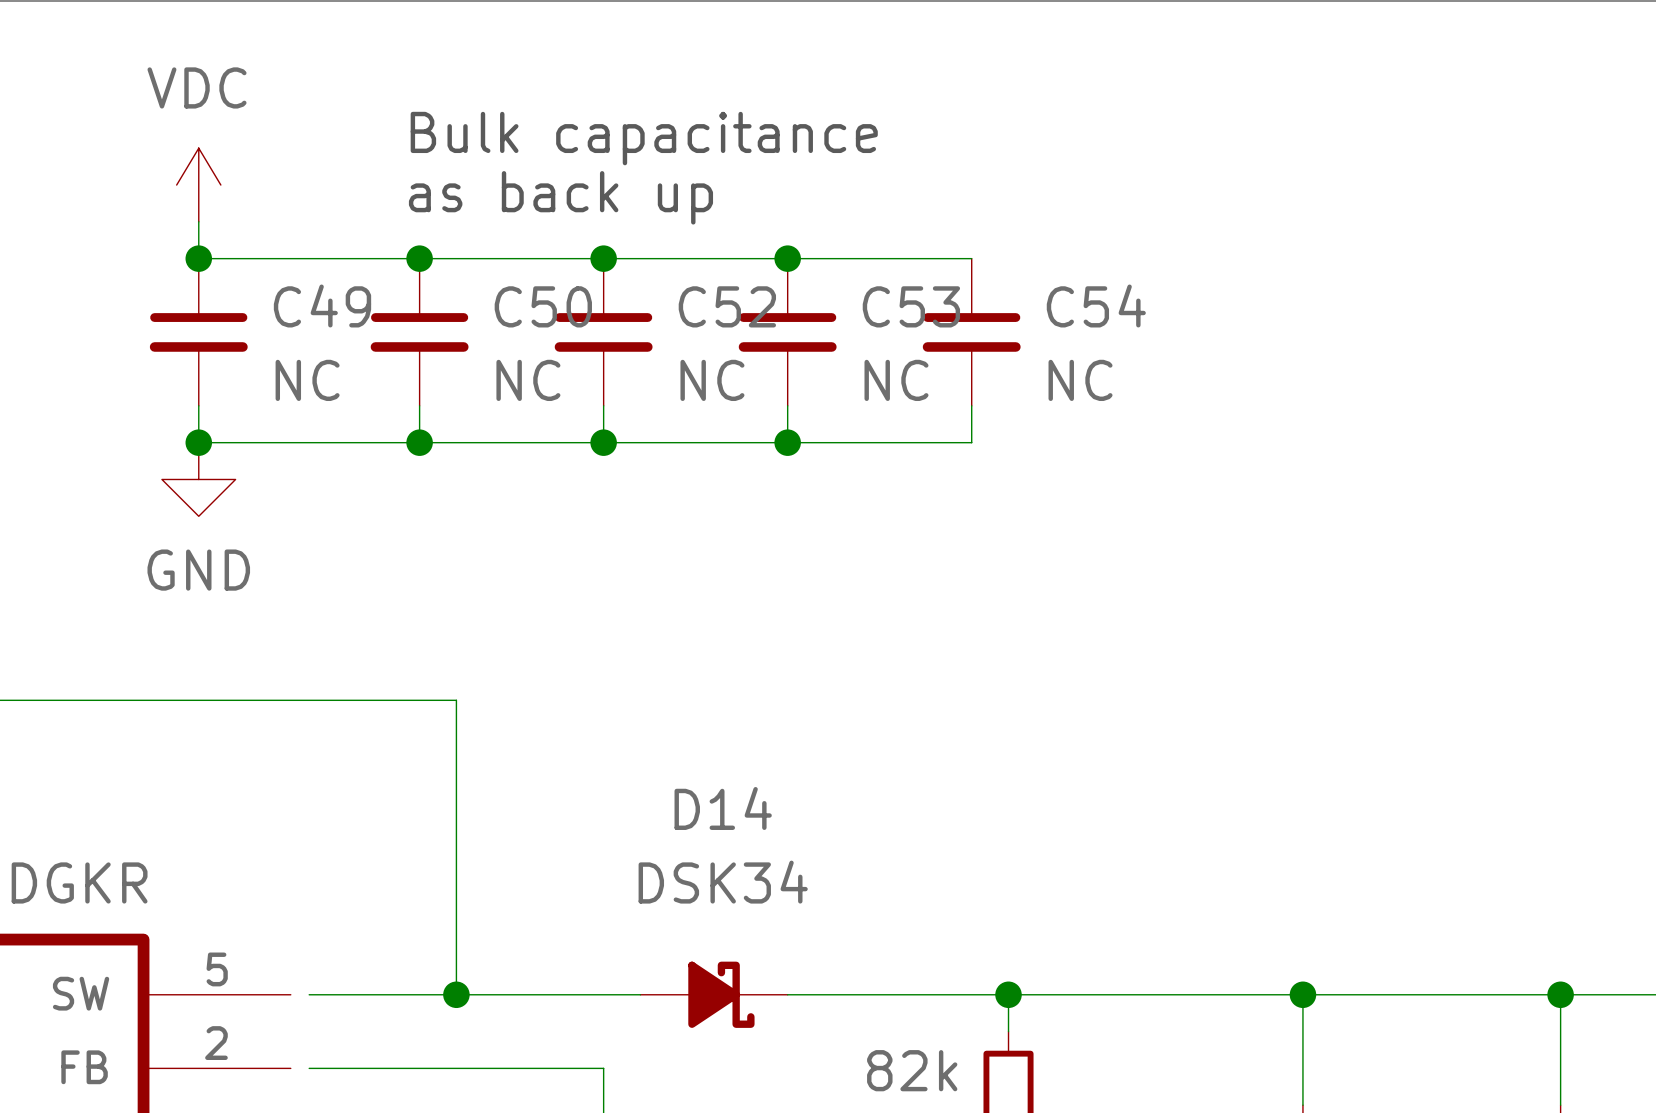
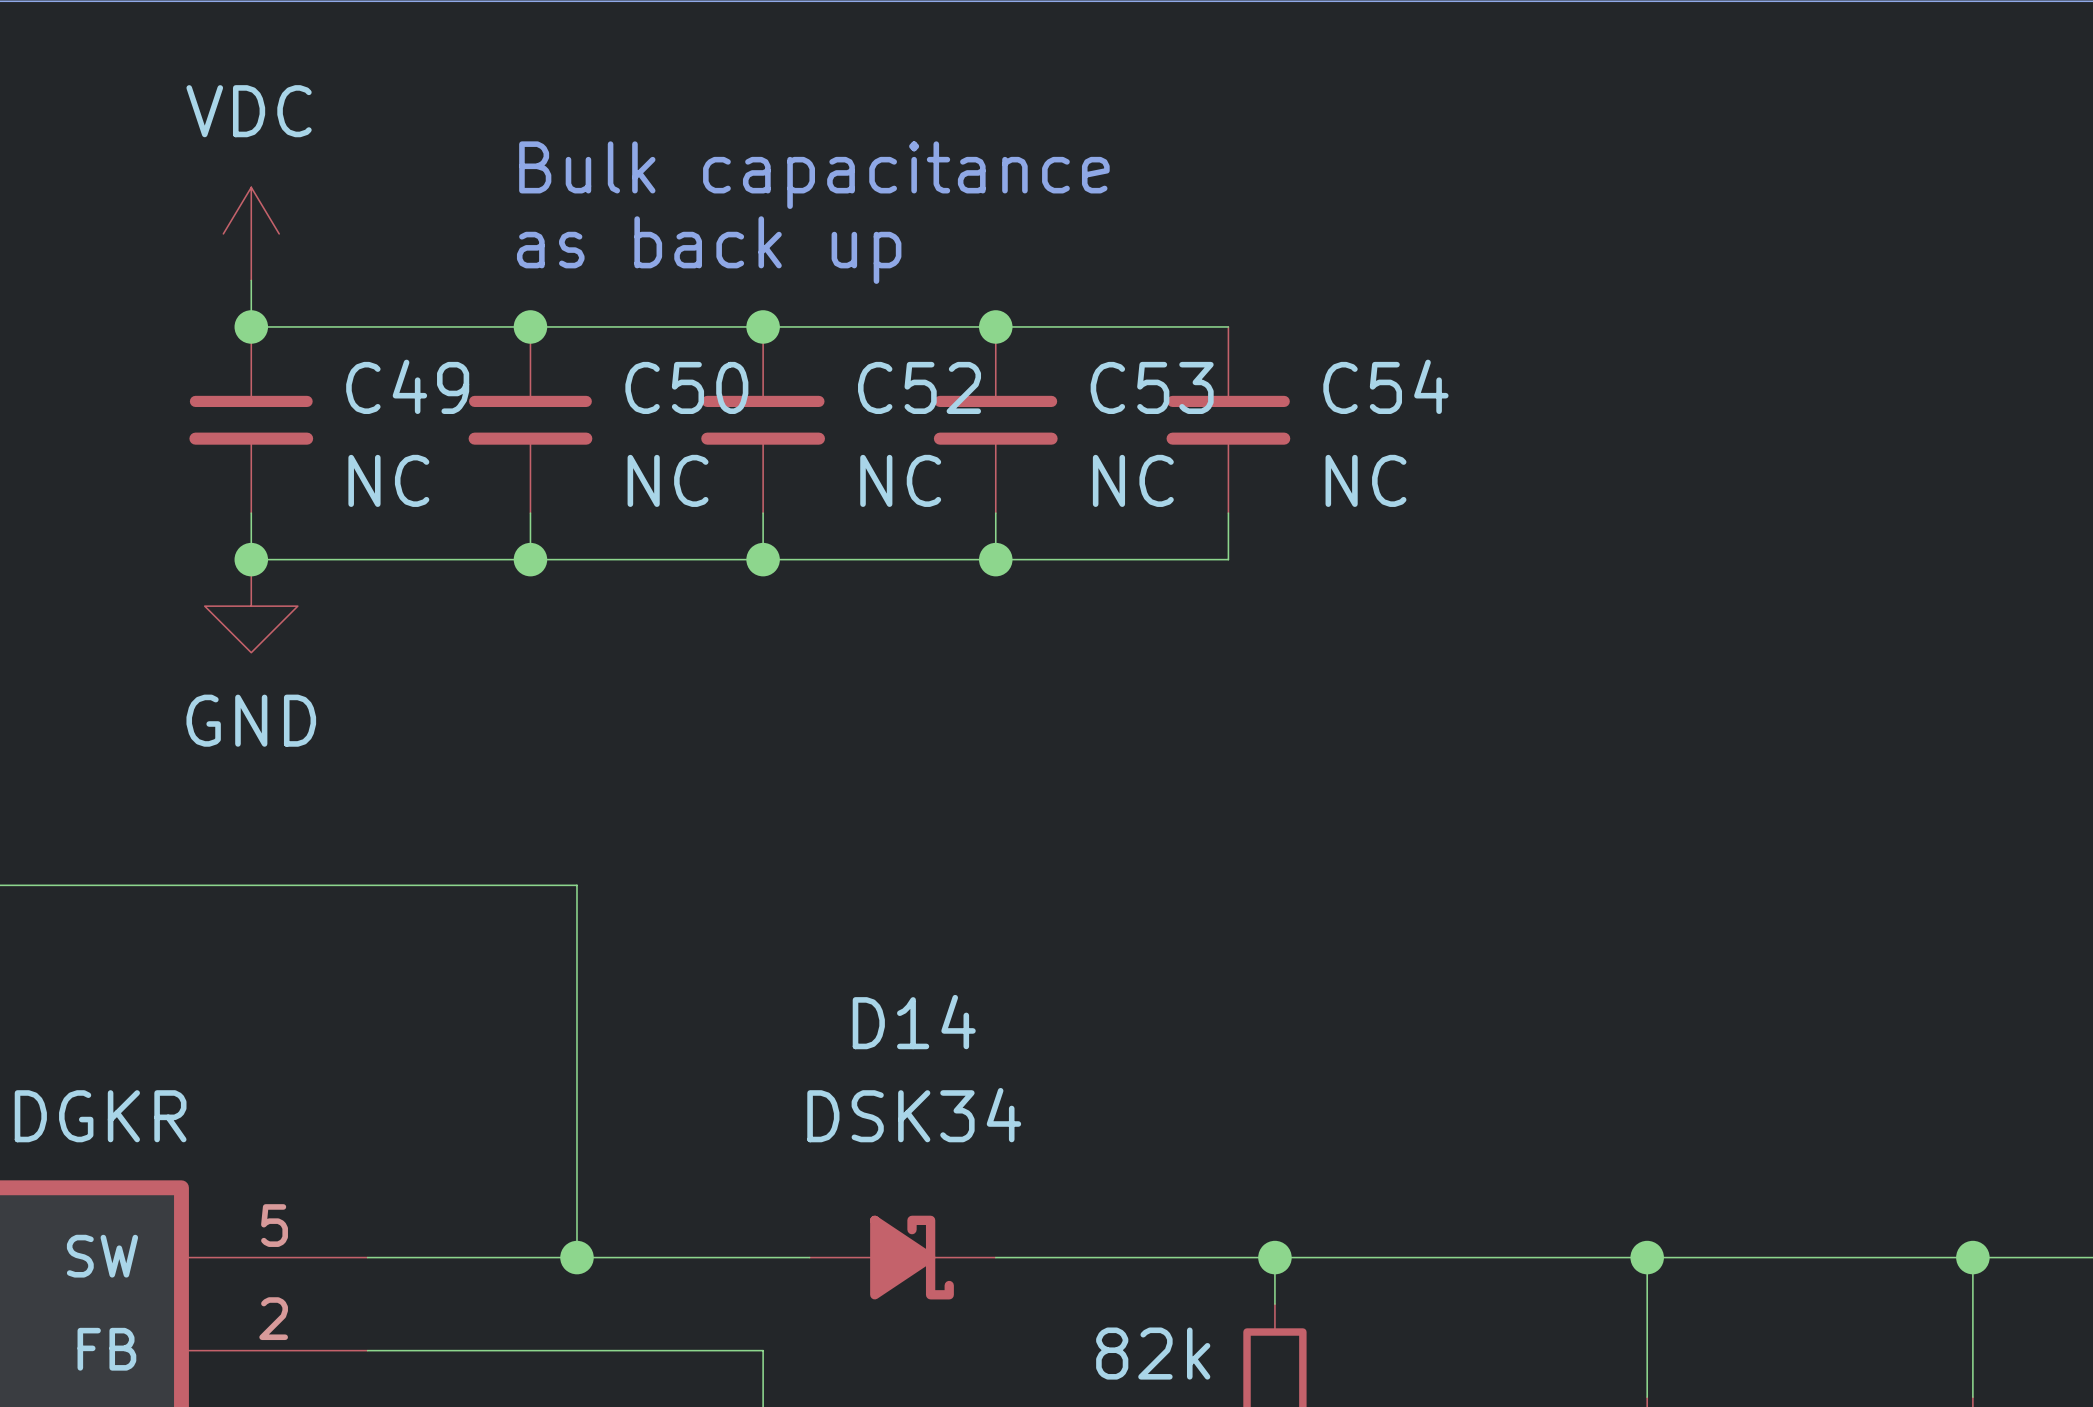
wire: none -> (367, 1257) (390, 1257)
wire: none -> (367, 1350) (390, 1350)

